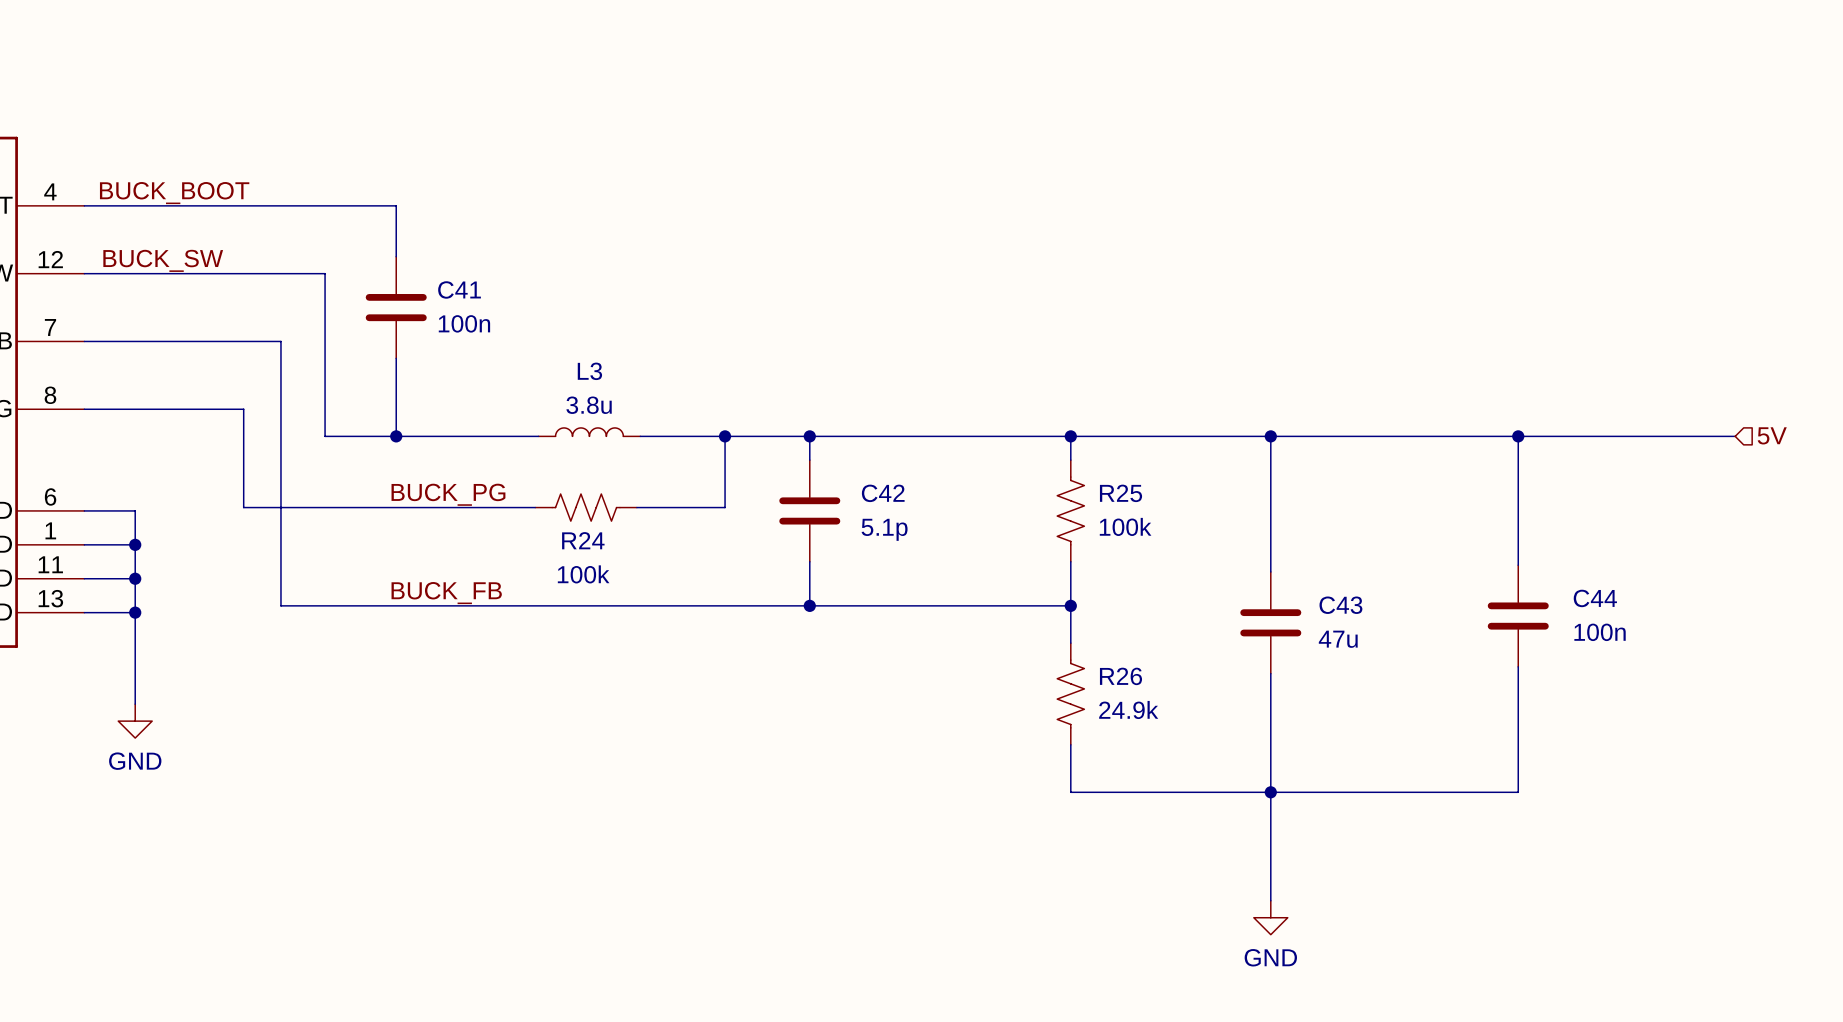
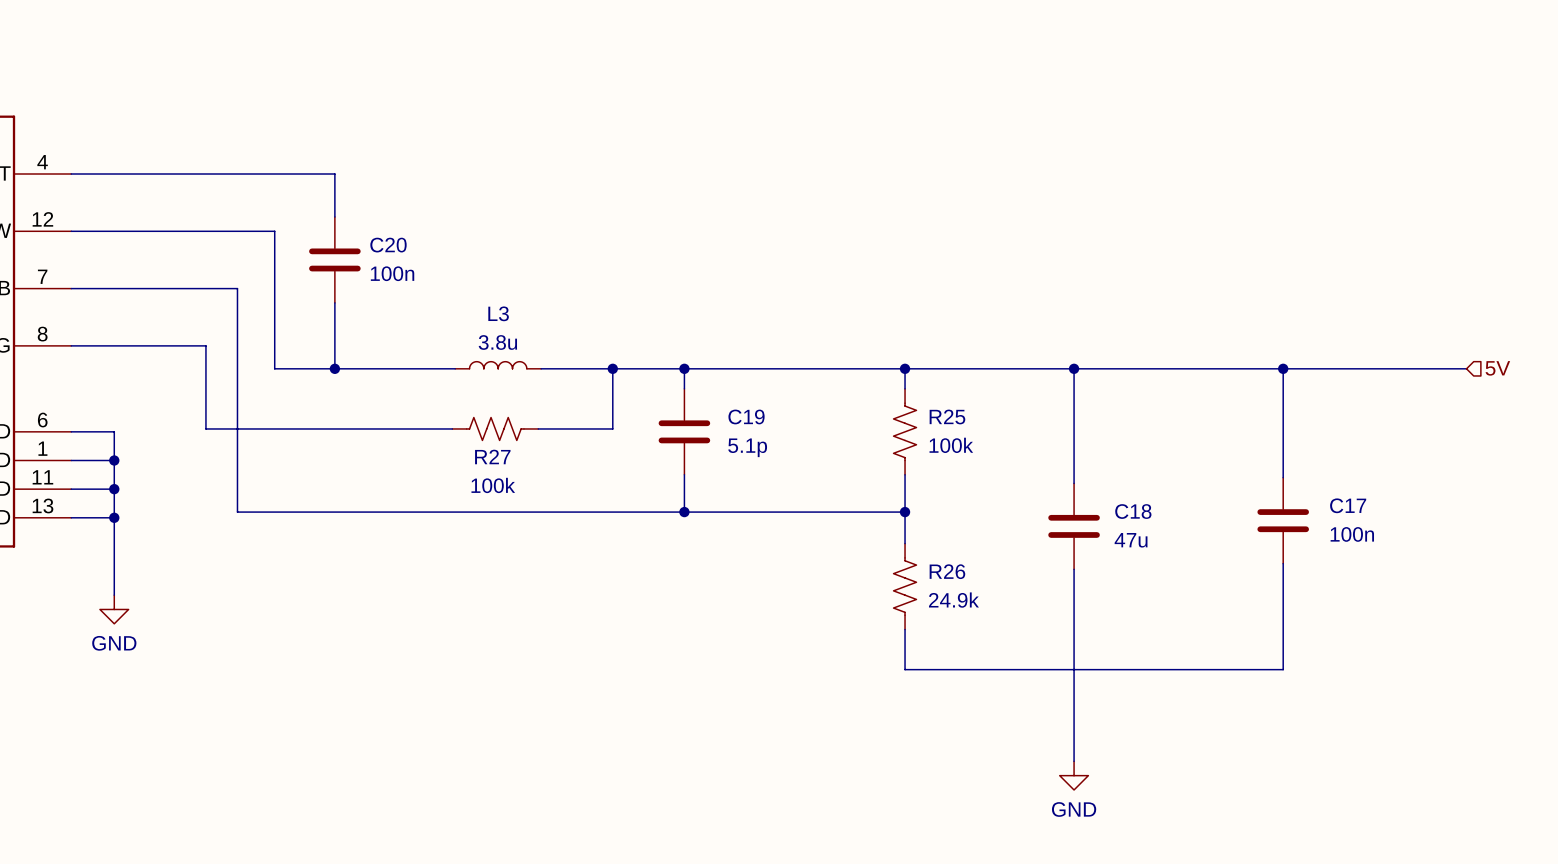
label: BUCK_BOOT (174, 193) -> none
label: BUCK_SW (163, 260) -> none
C41 name: C41 (459, 289) -> C20 (388, 245)
C42 name: C42 (883, 493) -> C19 (746, 416)
label: BUCK_PG (448, 494) -> none
R24 name: R24 (583, 540) -> R27 (492, 456)
label: BUCK_FB (446, 593) -> none
C44 name: C44 (1595, 598) -> C17 (1348, 505)
C43 name: C43 (1340, 605) -> C18 (1133, 511)
junction: (1270, 792) -> none

